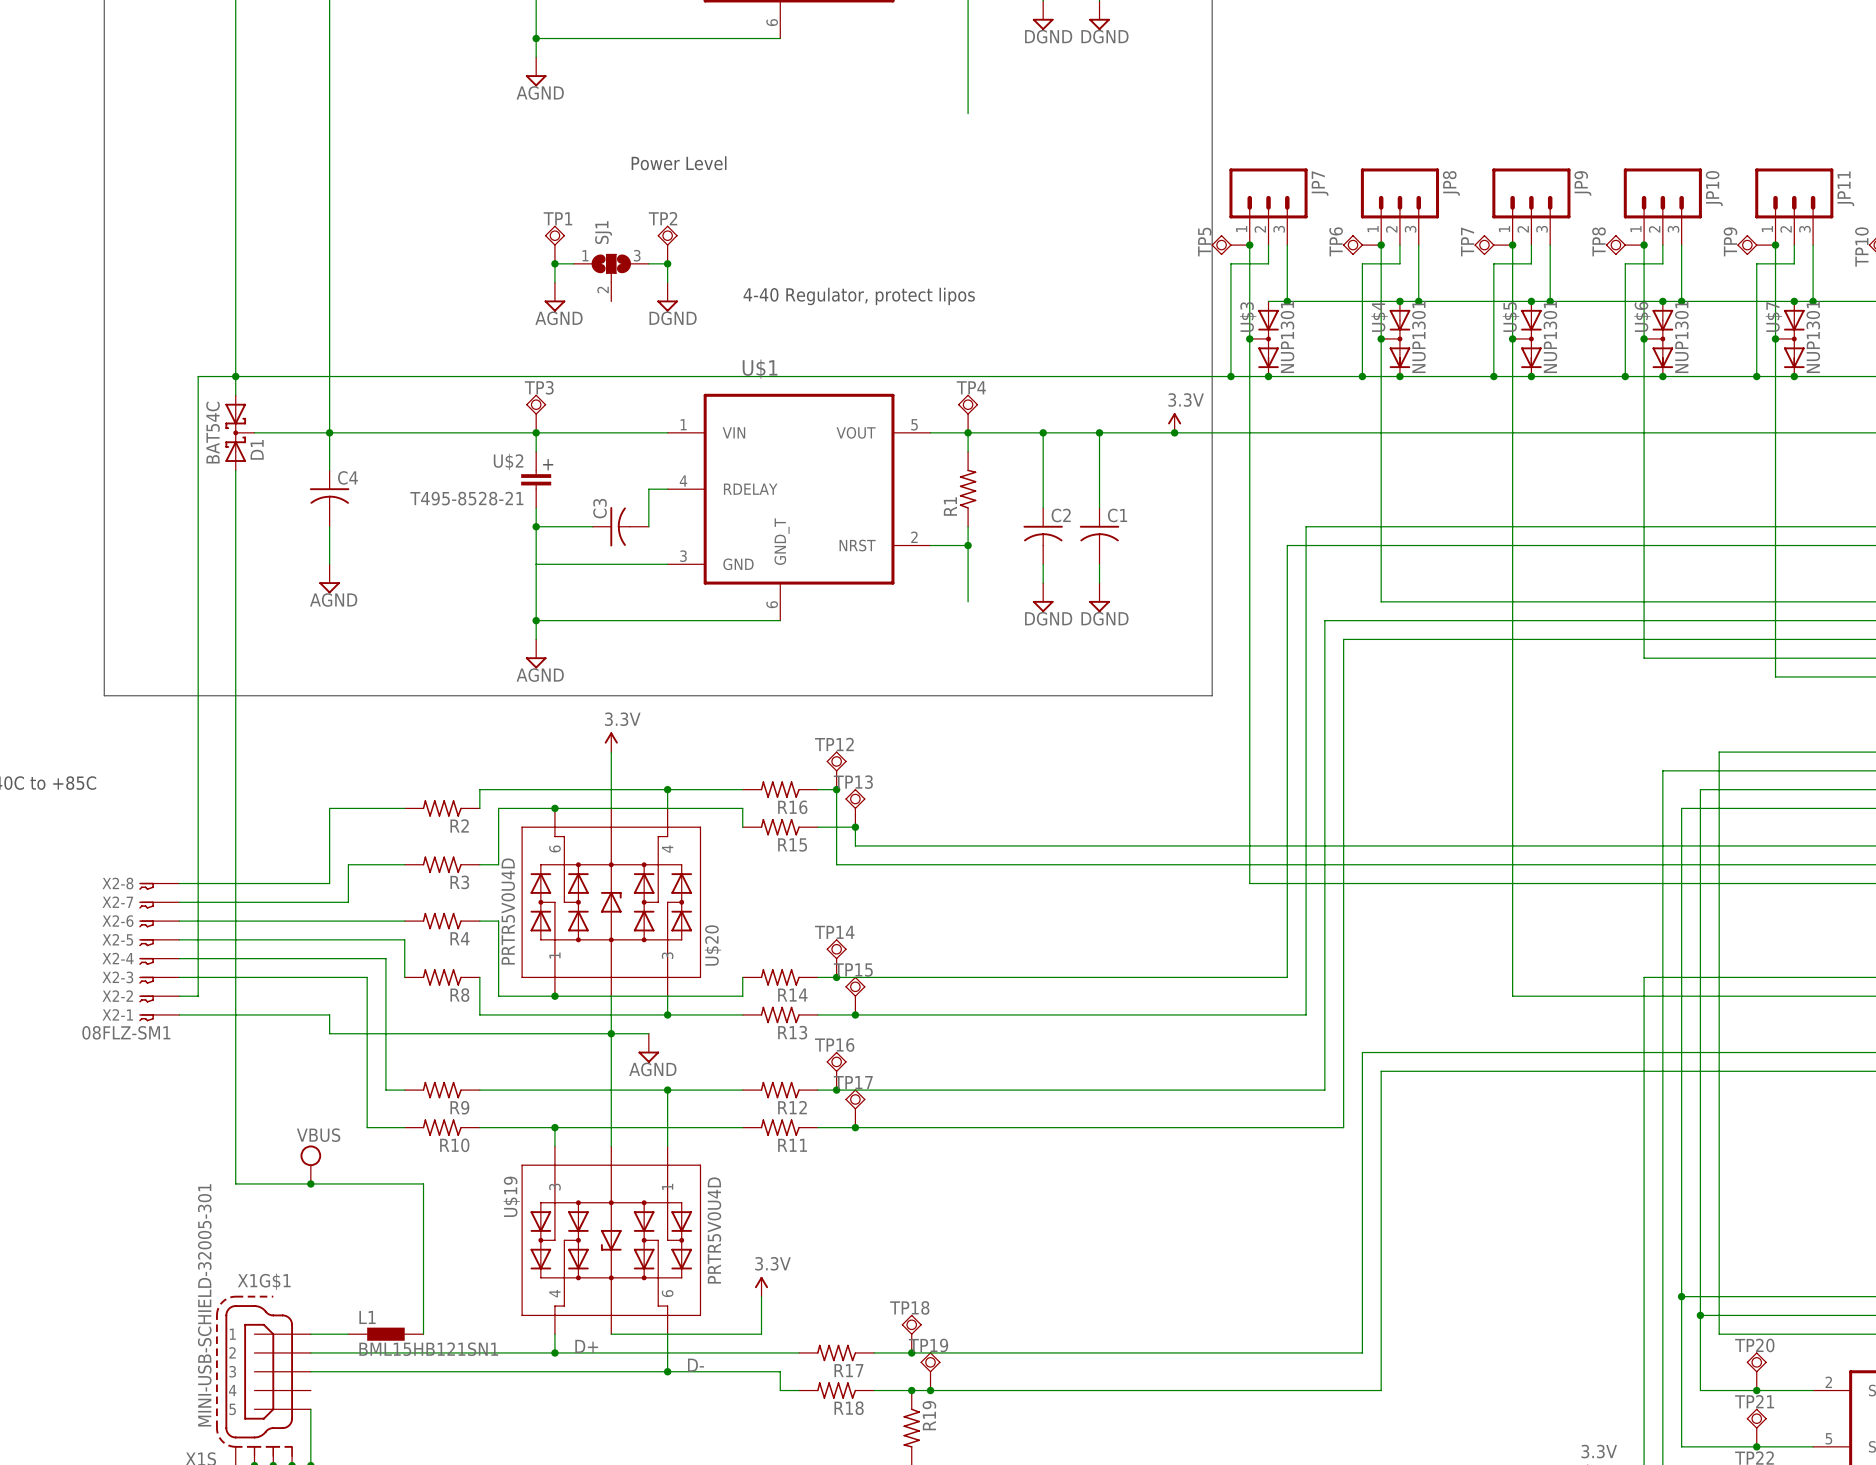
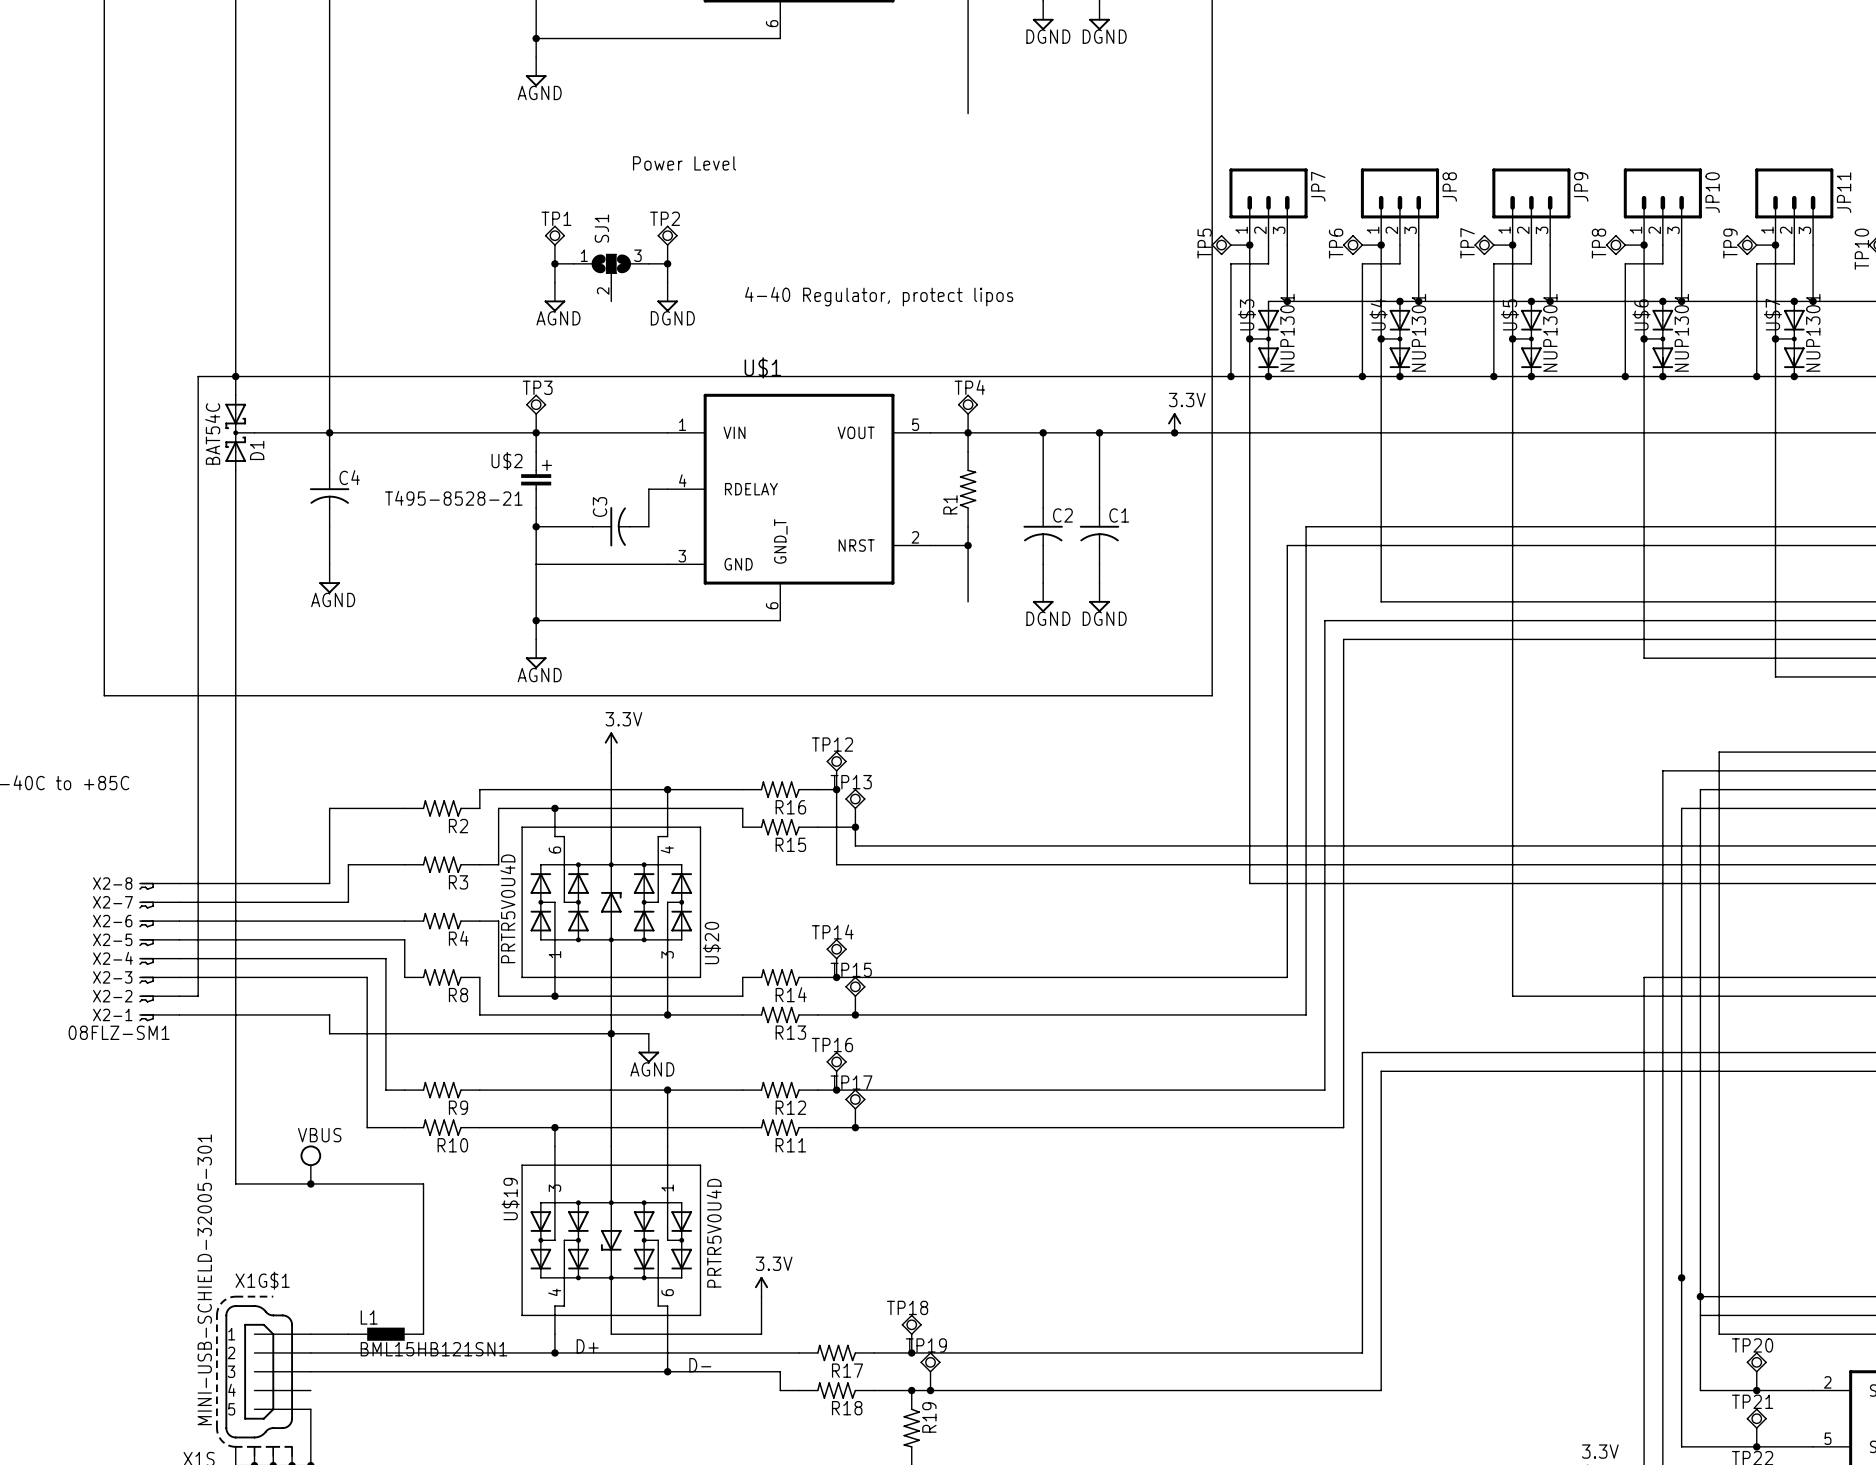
junction: none -> (1681, 1277)
wire: (1681, 1296) (1700, 1296) -> none
junction: (1681, 1296) -> none
junction: none -> (1700, 1296)
junction: (1700, 1315) -> none

